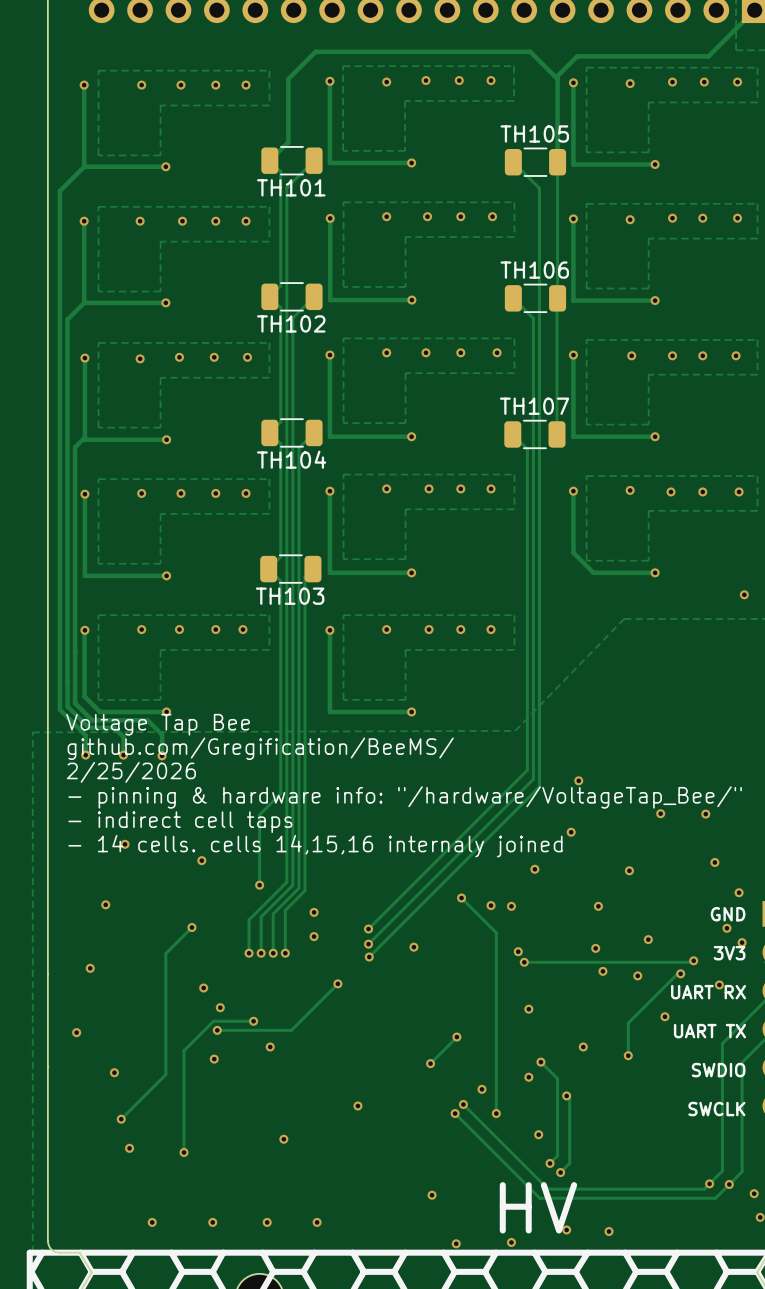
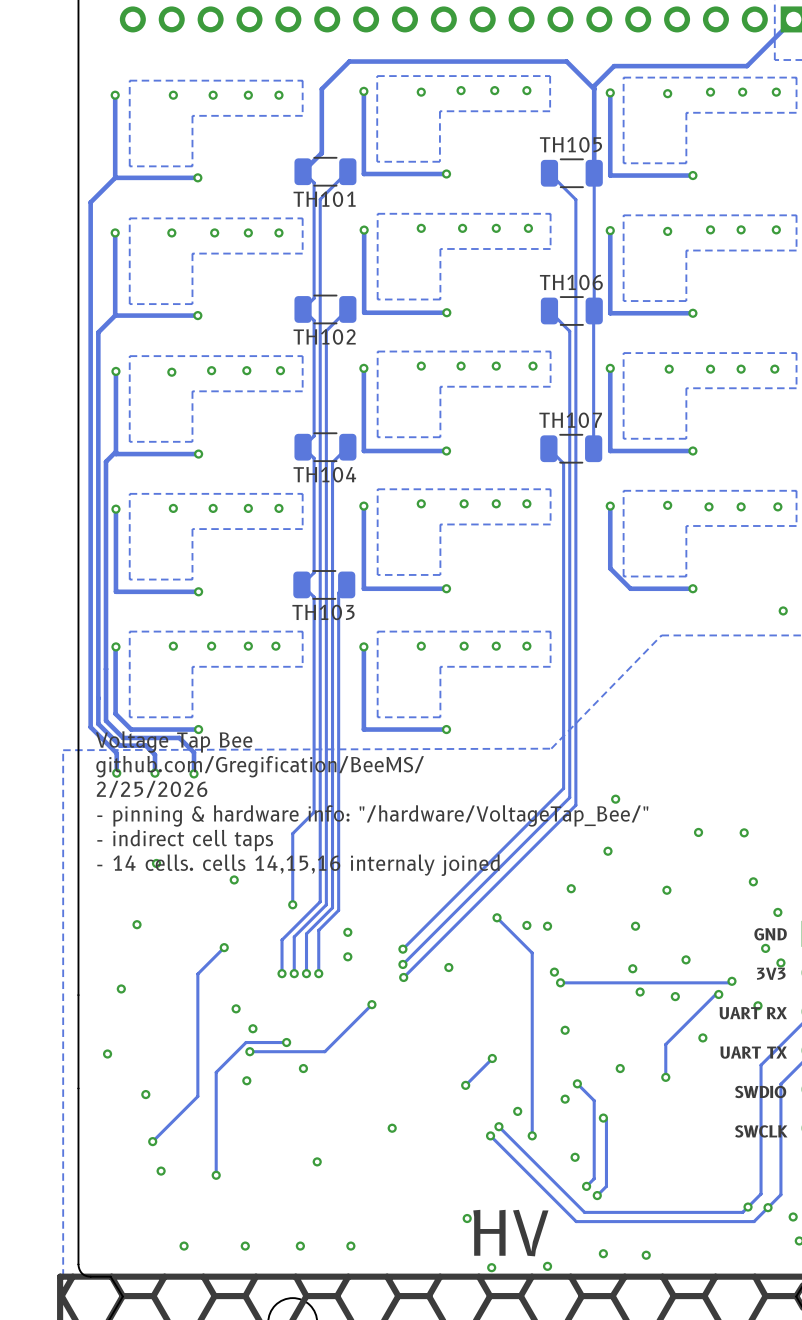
text position: HV (538, 1207) -> HV (510, 1233)

